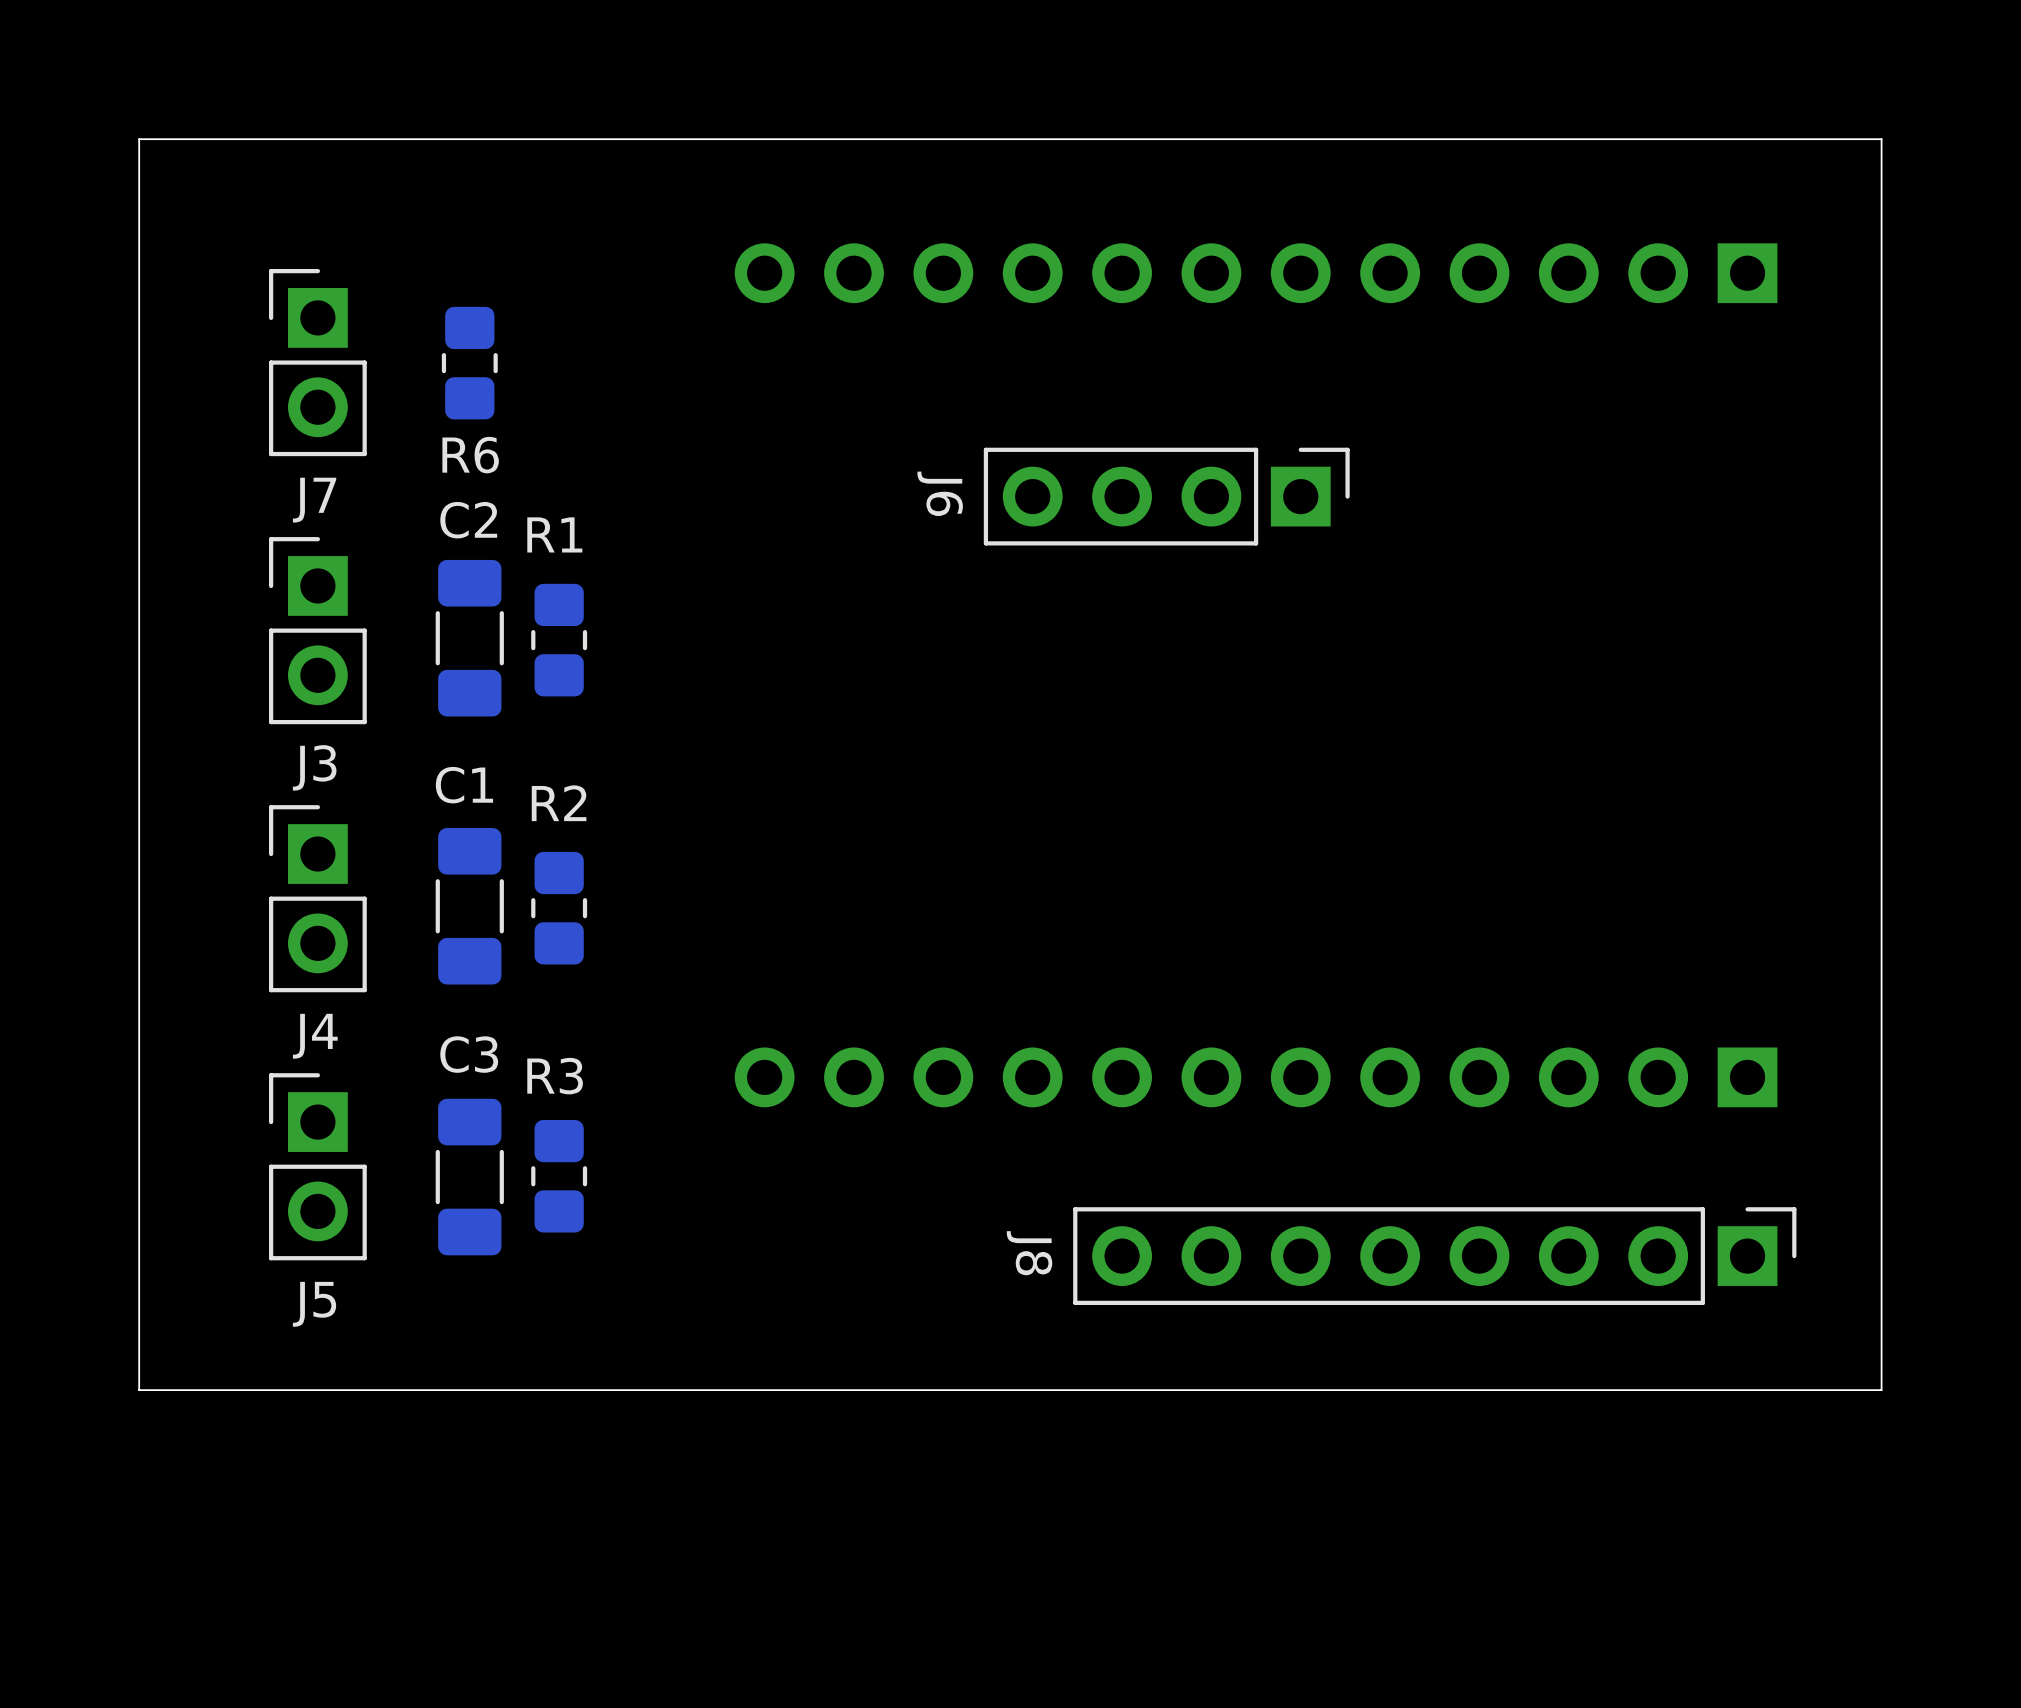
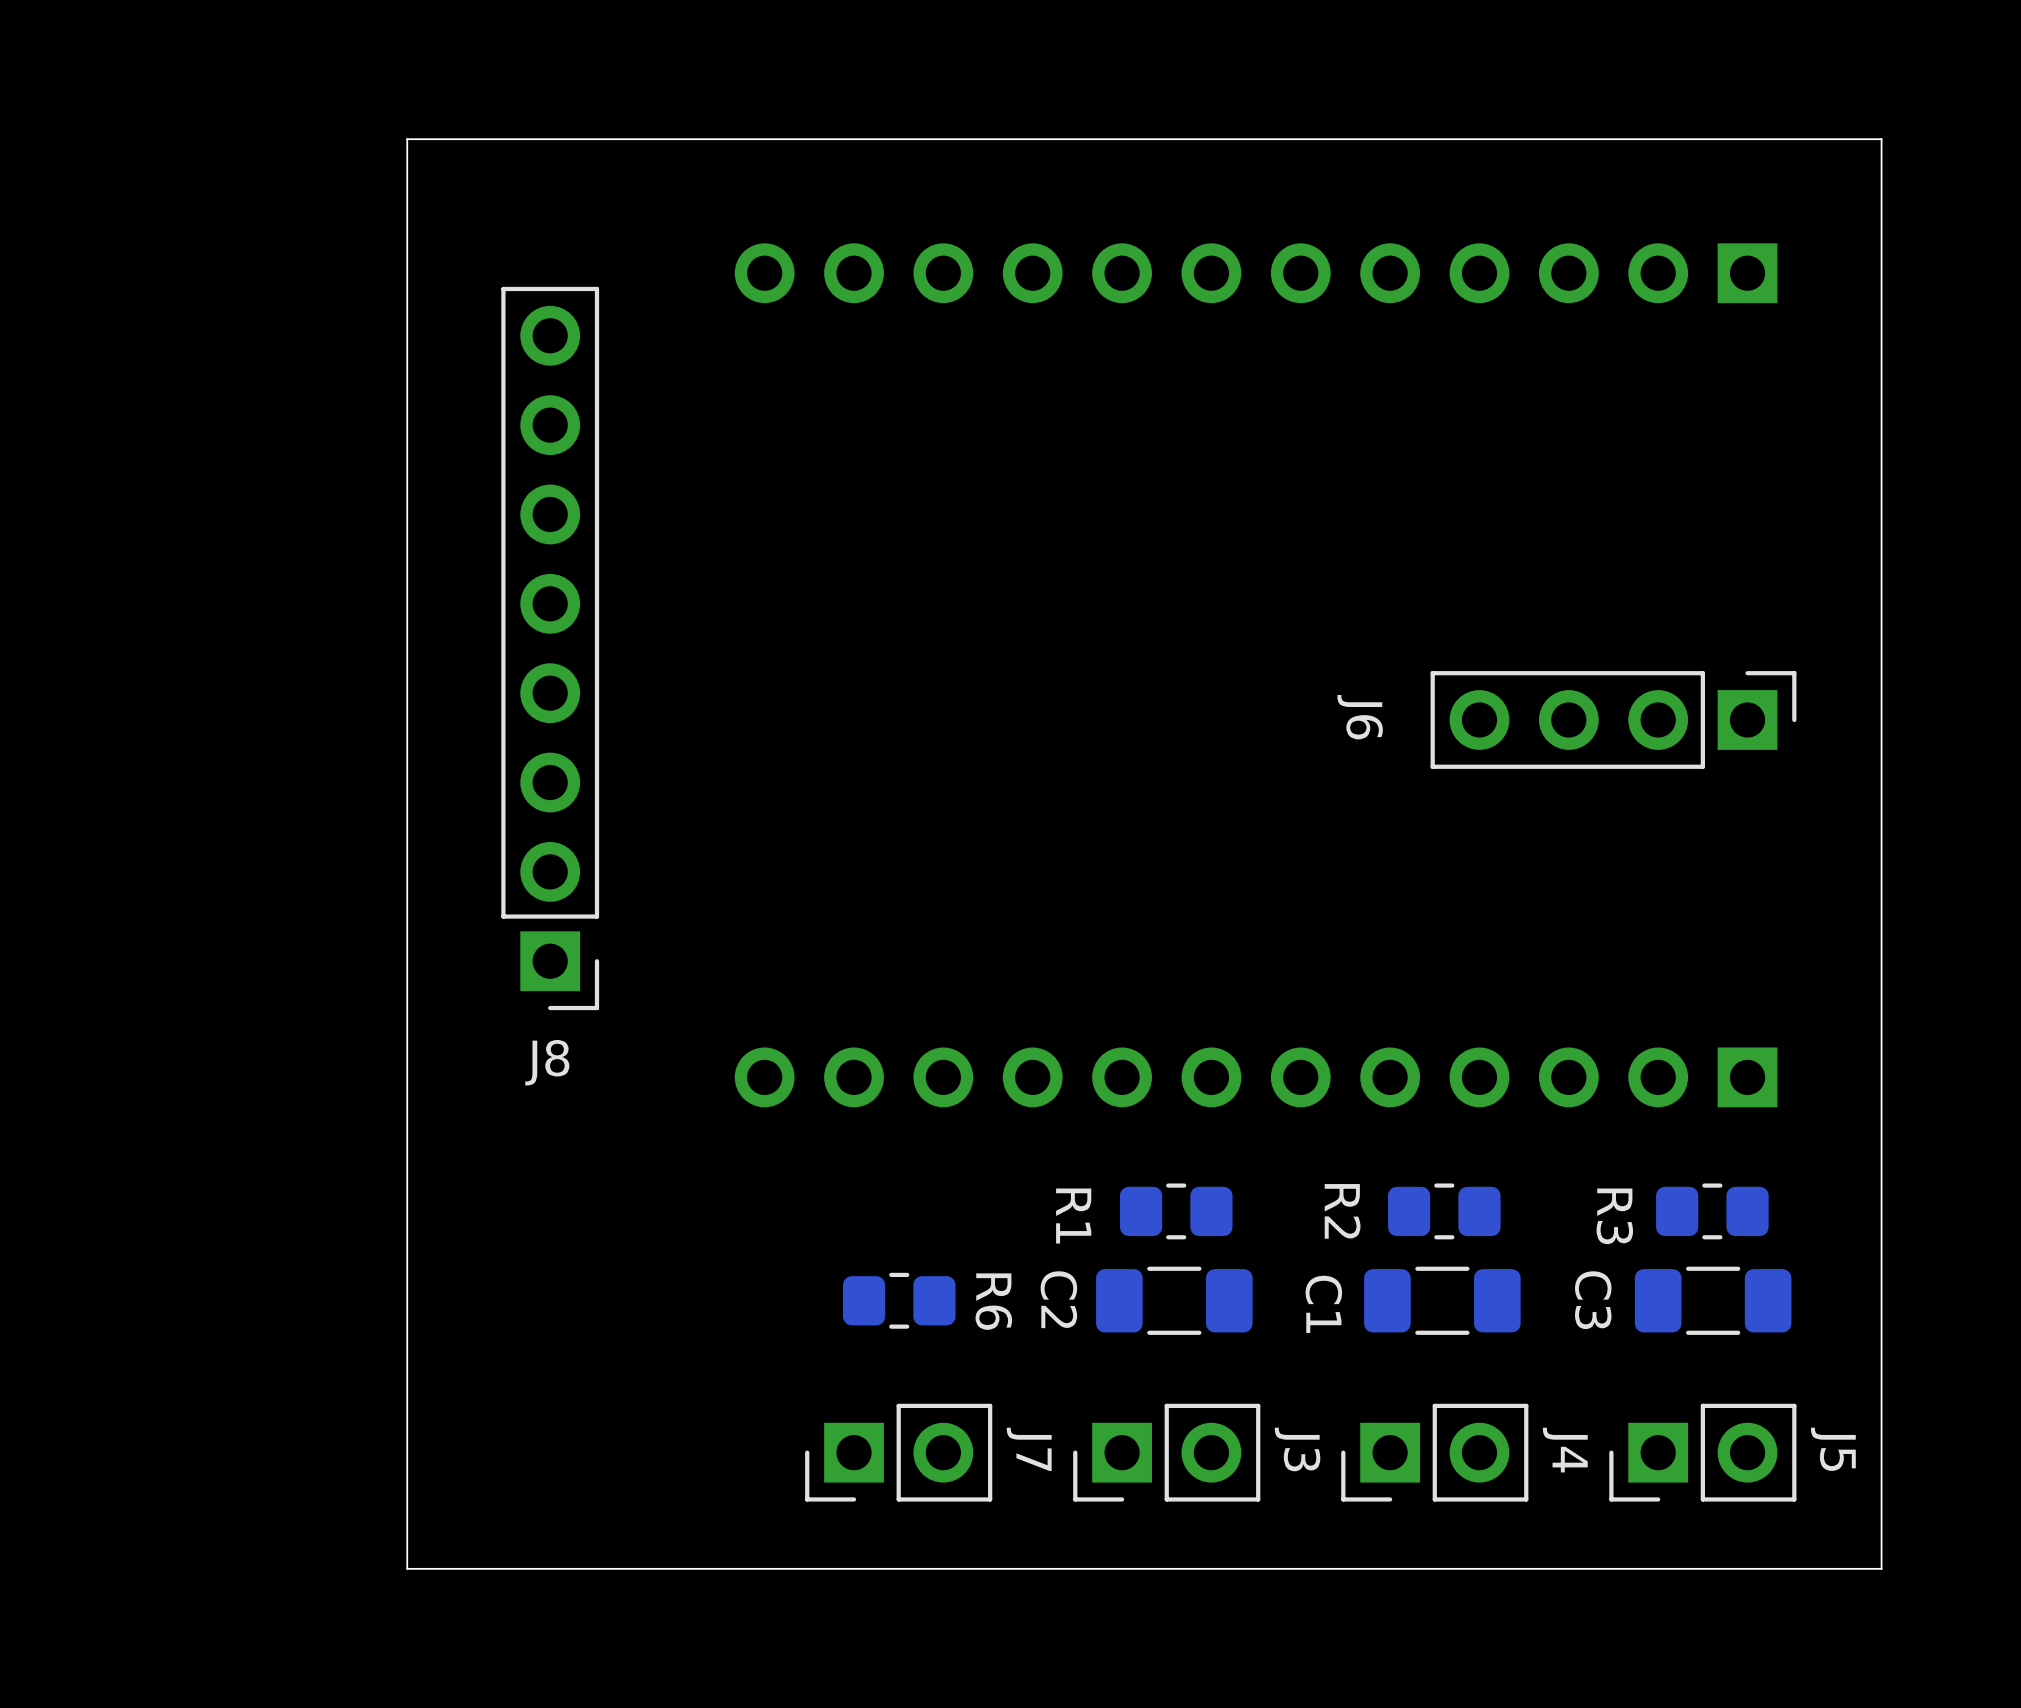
board edge: (407, 139) (139, 139) (139, 1390) (1881, 1390) -> (407, 139) (407, 1568) (1881, 1568) (1881, 1390)
J7 rotation: 0° (317, 362) -> 90° counterclockwise (898, 1452)
J7 position: (317, 362) -> (898, 1452)
R6 rotation: 0° (469, 363) -> 90° clockwise (899, 1300)
R6 position: (469, 363) -> (899, 1300)
R6 name position: R6 (470, 455) -> R6 (993, 1301)
J6 name position: J6 (940, 493) -> J6 (1360, 717)
J6 position: (1166, 496) -> (1613, 719)
C2 name position: C2 (468, 520) -> C2 (1058, 1299)
R1 name position: R1 (554, 534) -> R1 (1073, 1216)
J3 rotation: 0° (317, 630) -> 90° counterclockwise (1166, 1452)
J3 position: (317, 630) -> (1166, 1452)
C2 rotation: 0° (469, 638) -> 90° clockwise (1174, 1300)
C2 position: (469, 638) -> (1174, 1300)
R1 rotation: 0° (559, 640) -> 90° clockwise (1176, 1211)
R1 position: (559, 640) -> (1176, 1211)
C1 name position: C1 (464, 785) -> C1 (1323, 1304)
R2 name position: R2 (559, 803) -> R2 (1342, 1211)
J4 rotation: 0° (317, 898) -> 90° counterclockwise (1434, 1452)
J4 position: (317, 898) -> (1434, 1452)
C1 rotation: 0° (469, 906) -> 90° clockwise (1442, 1300)
C1 position: (469, 906) -> (1442, 1300)
R2 rotation: 0° (559, 908) -> 90° clockwise (1444, 1211)
R2 position: (559, 908) -> (1444, 1211)
C3 name position: C3 (469, 1054) -> C3 (1593, 1300)
R3 name position: R3 (555, 1076) -> R3 (1614, 1216)
J5 rotation: 0° (317, 1166) -> 90° counterclockwise (1702, 1452)
J5 position: (317, 1166) -> (1702, 1452)
R3 rotation: 0° (559, 1176) -> 90° clockwise (1712, 1211)
R3 position: (559, 1176) -> (1712, 1211)
C3 rotation: 0° (469, 1177) -> 90° clockwise (1713, 1300)
C3 position: (469, 1177) -> (1713, 1300)
J8 name position: J8 (1029, 1253) -> J8 (547, 1062)
J8 rotation: 0° (1434, 1256) -> 90° clockwise (550, 648)
J8 position: (1434, 1256) -> (550, 648)

